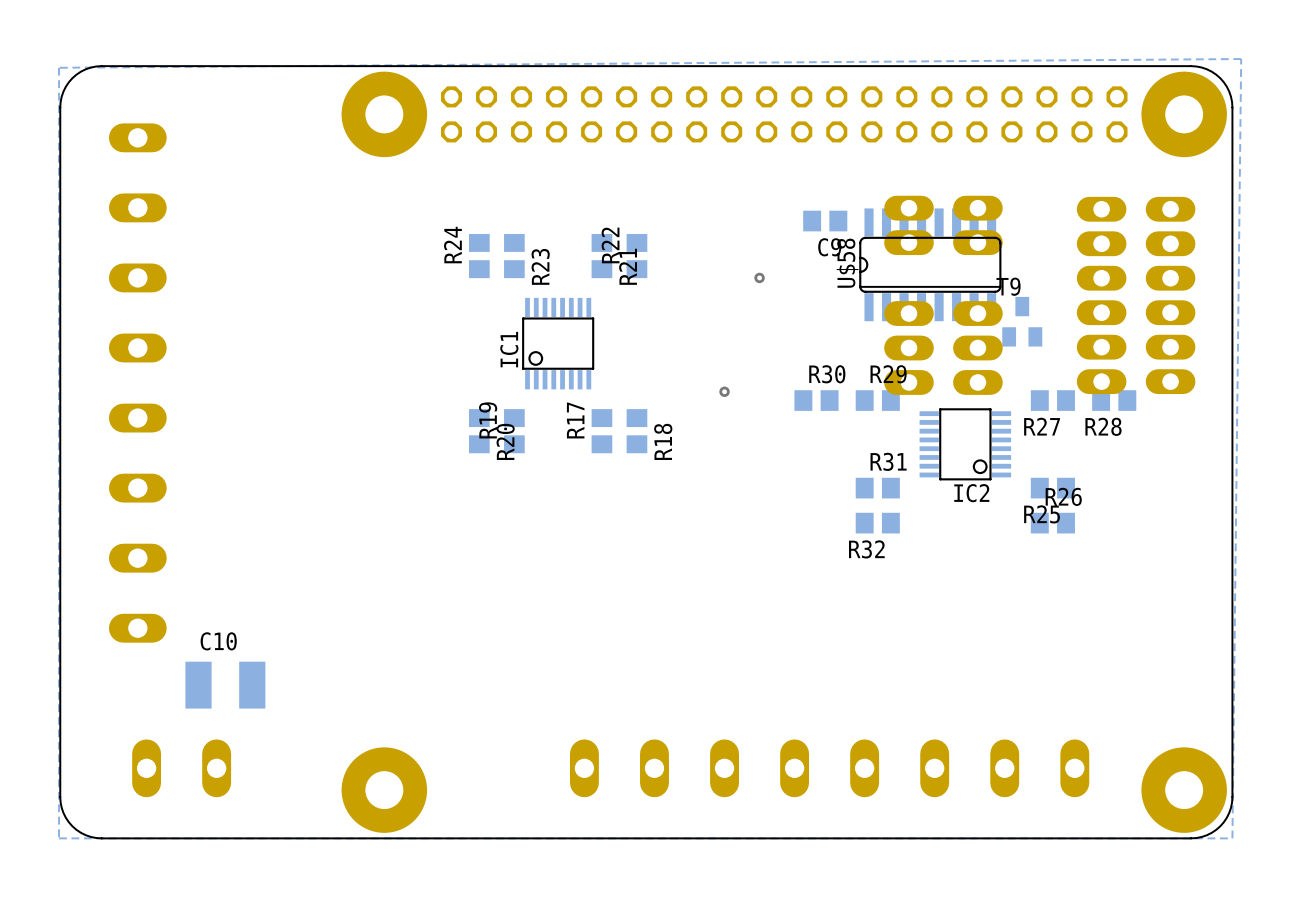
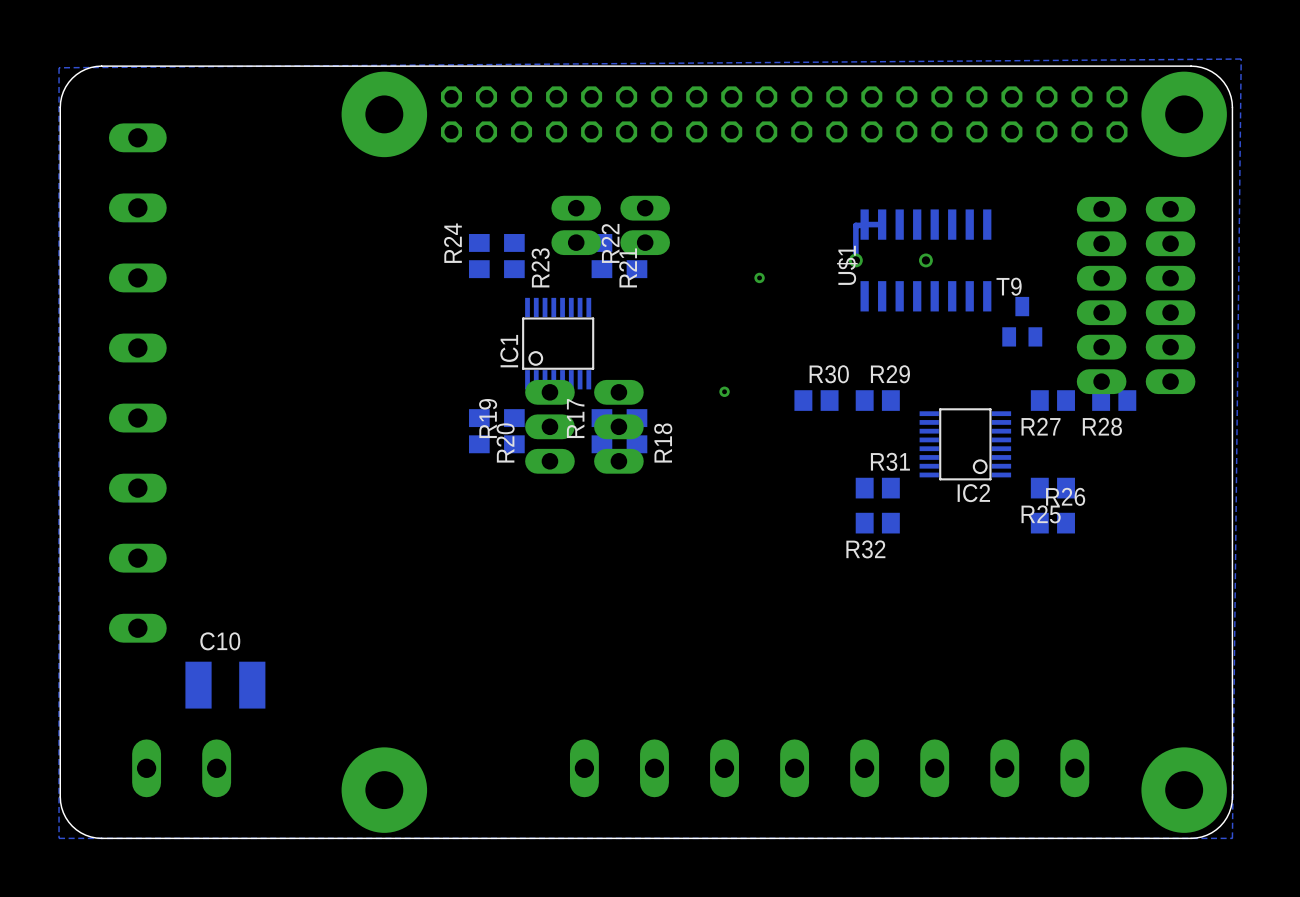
C9: (825, 221) -> none
track: none -> (882, 224) (855, 225) (855, 260)
part position: (943, 225) -> (610, 225)
via: none -> (855, 260)
U$1: none -> (925, 260)
via: none -> (925, 260)
U$58: (930, 264) -> none
part: (943, 348) -> none
part: none -> (584, 426)

